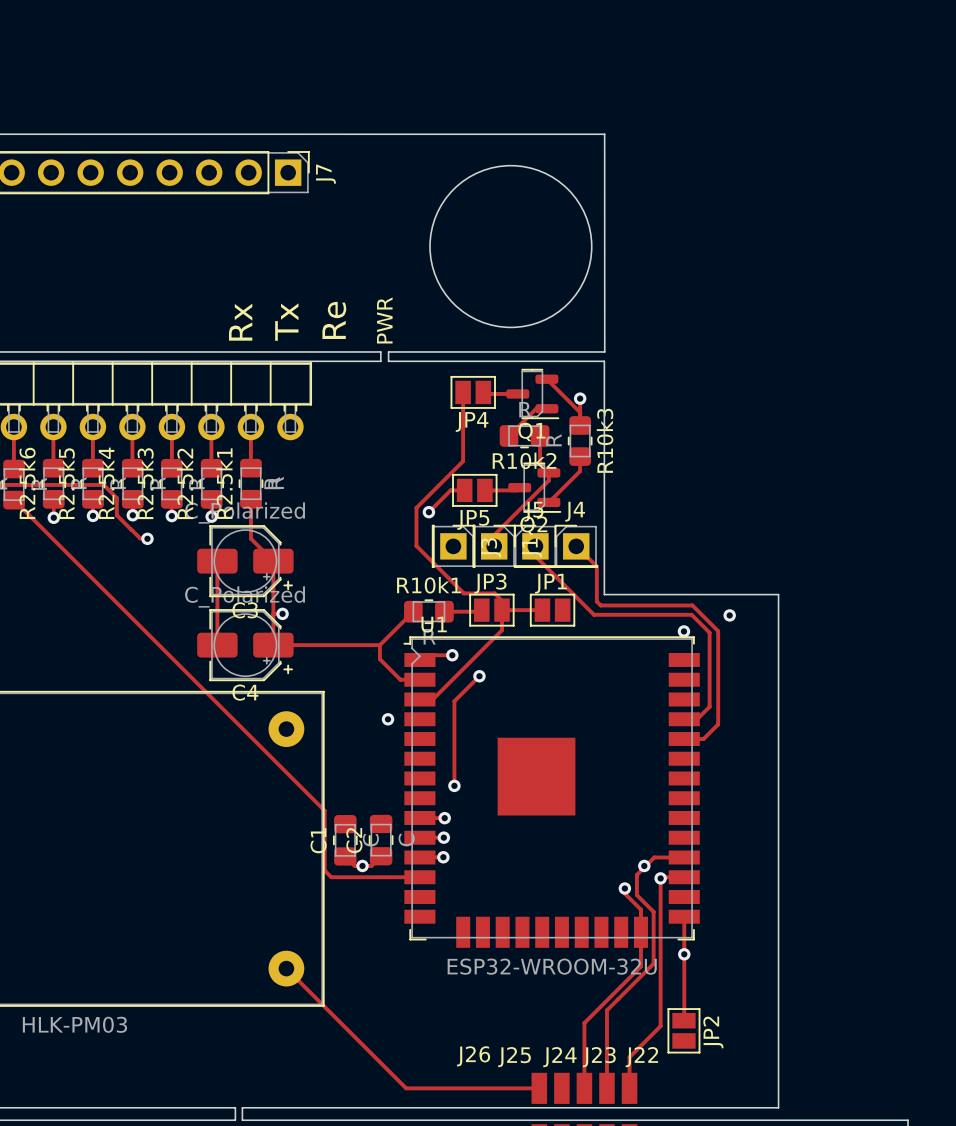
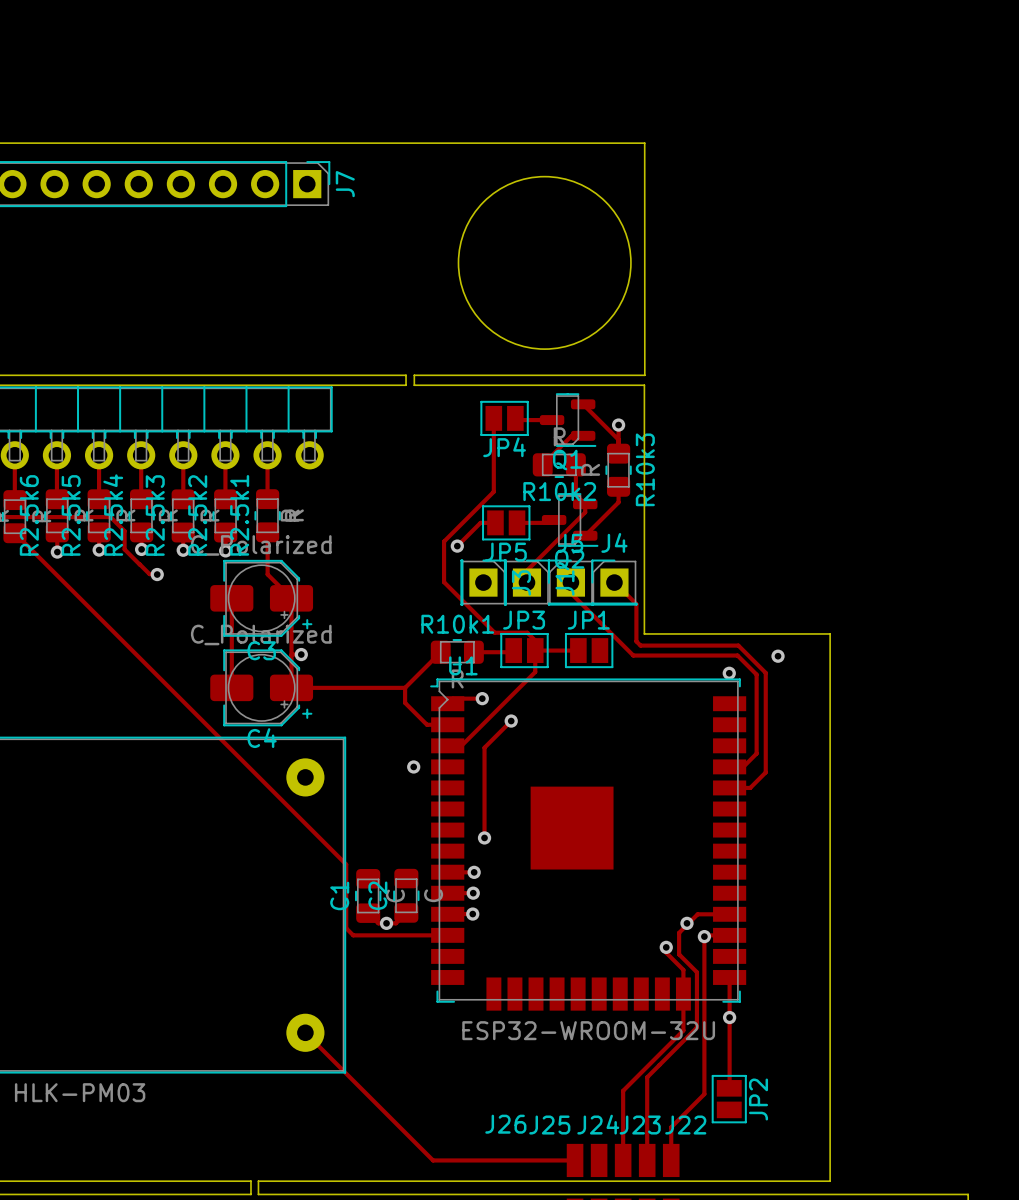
text: Re (334, 320) -> none
text: PWR (384, 320) -> none
text: Rx (240, 322) -> none
text: Tx (286, 322) -> none

